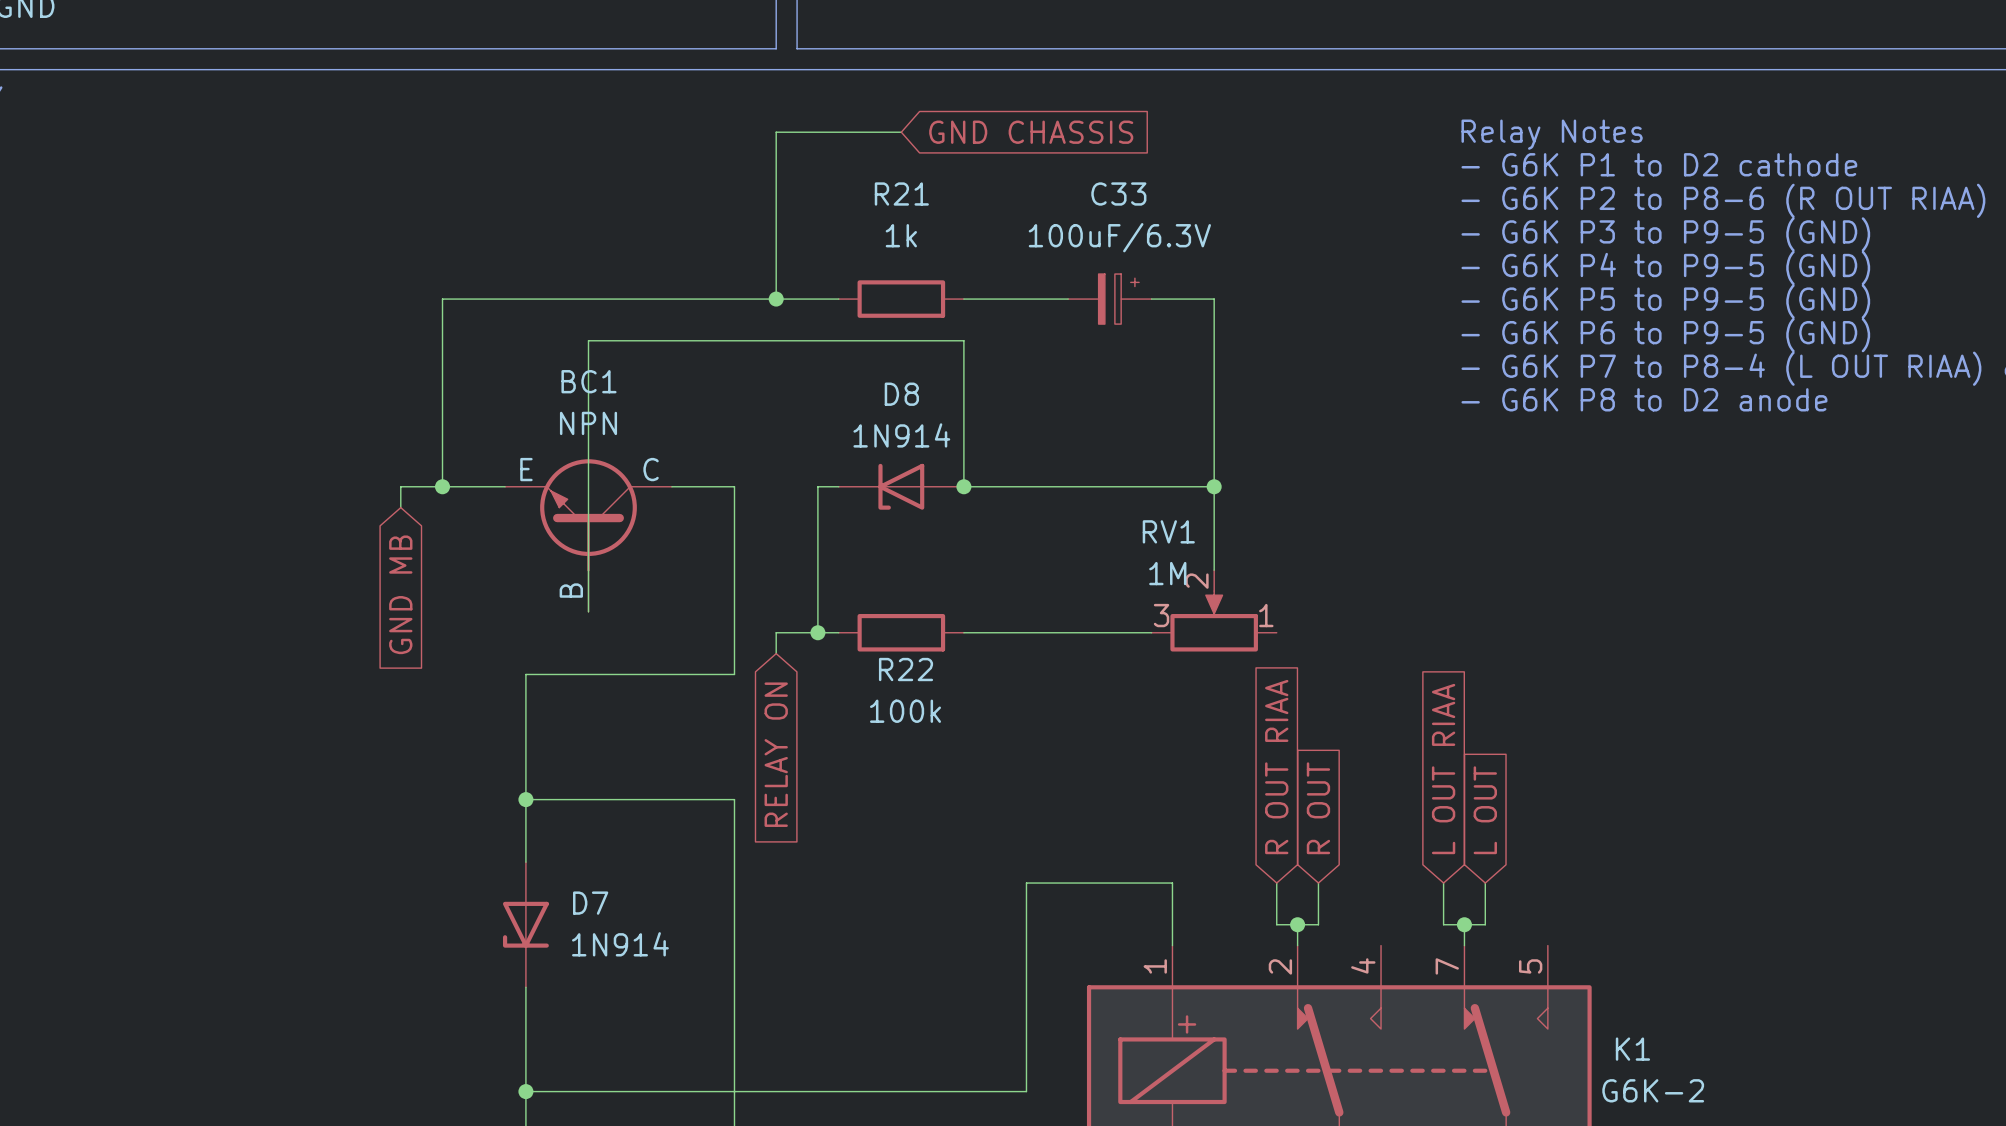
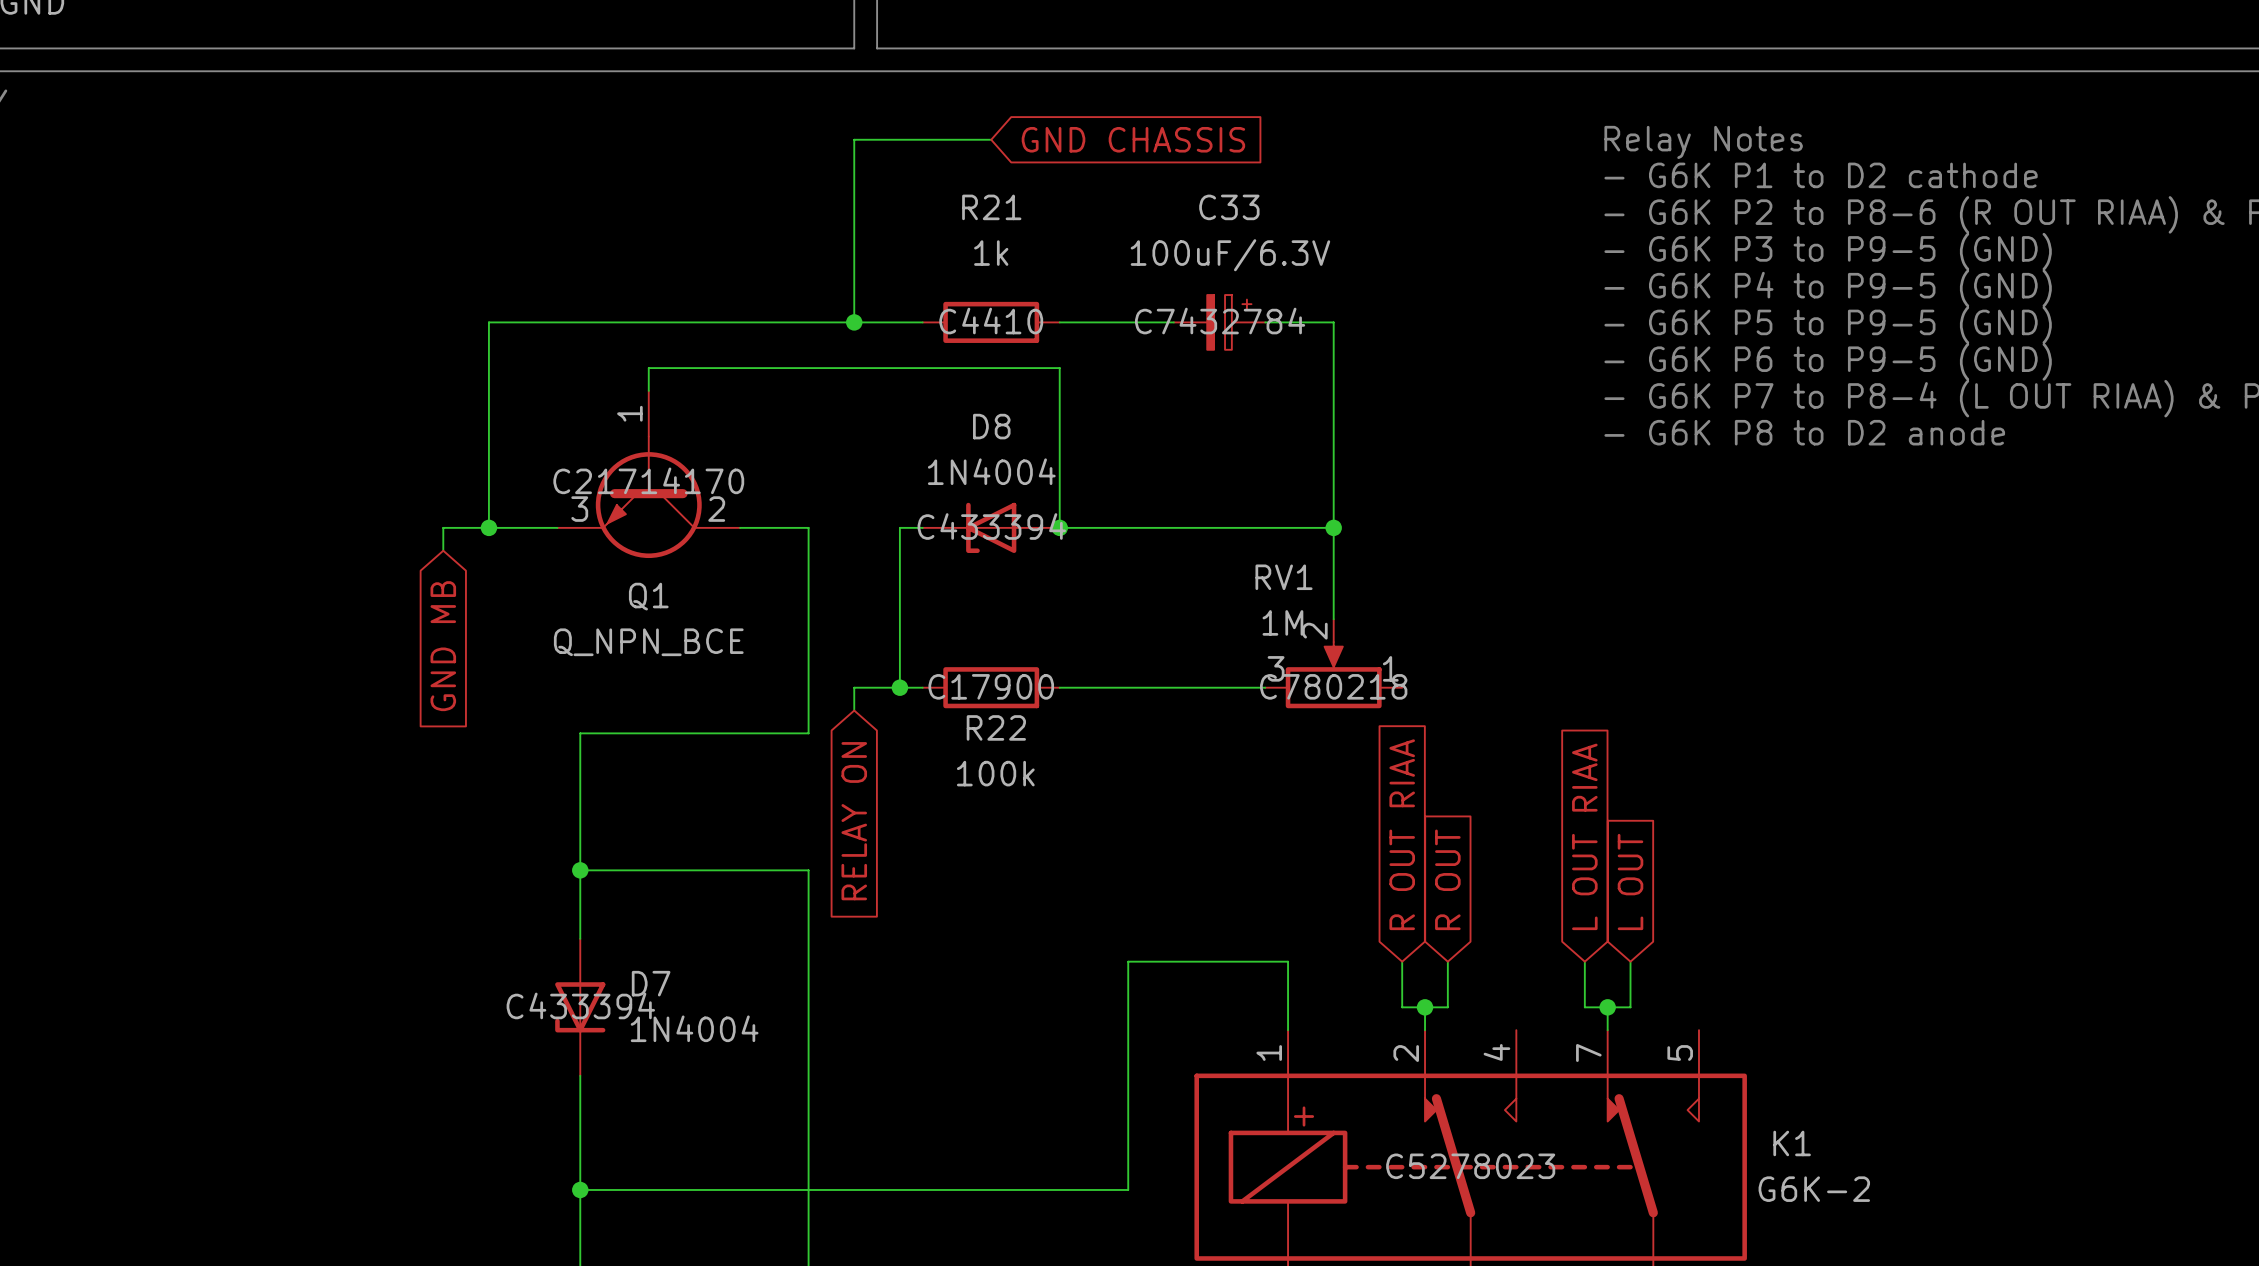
R21 text: none -> C4410 (991, 321)
C33 text: none -> C7432784 (1220, 321)
wire: (588, 361) (588, 611) -> none
D8 value: 1N914 (901, 435) -> 1N4004 (991, 471)
Q1: none -> Q_NPN_BCE (648, 474)
D8 text: none -> C433394 (991, 526)
BC1: NPN (588, 535) -> none
R22 text: none -> C17900 (991, 686)
RV1 text: none -> C780218 (1333, 686)
D7 text: none -> C433394 (580, 1005)
D7 value: 1N914 (620, 944) -> 1N4004 (694, 1028)
K1 text: none -> C5278023 (1470, 1166)

